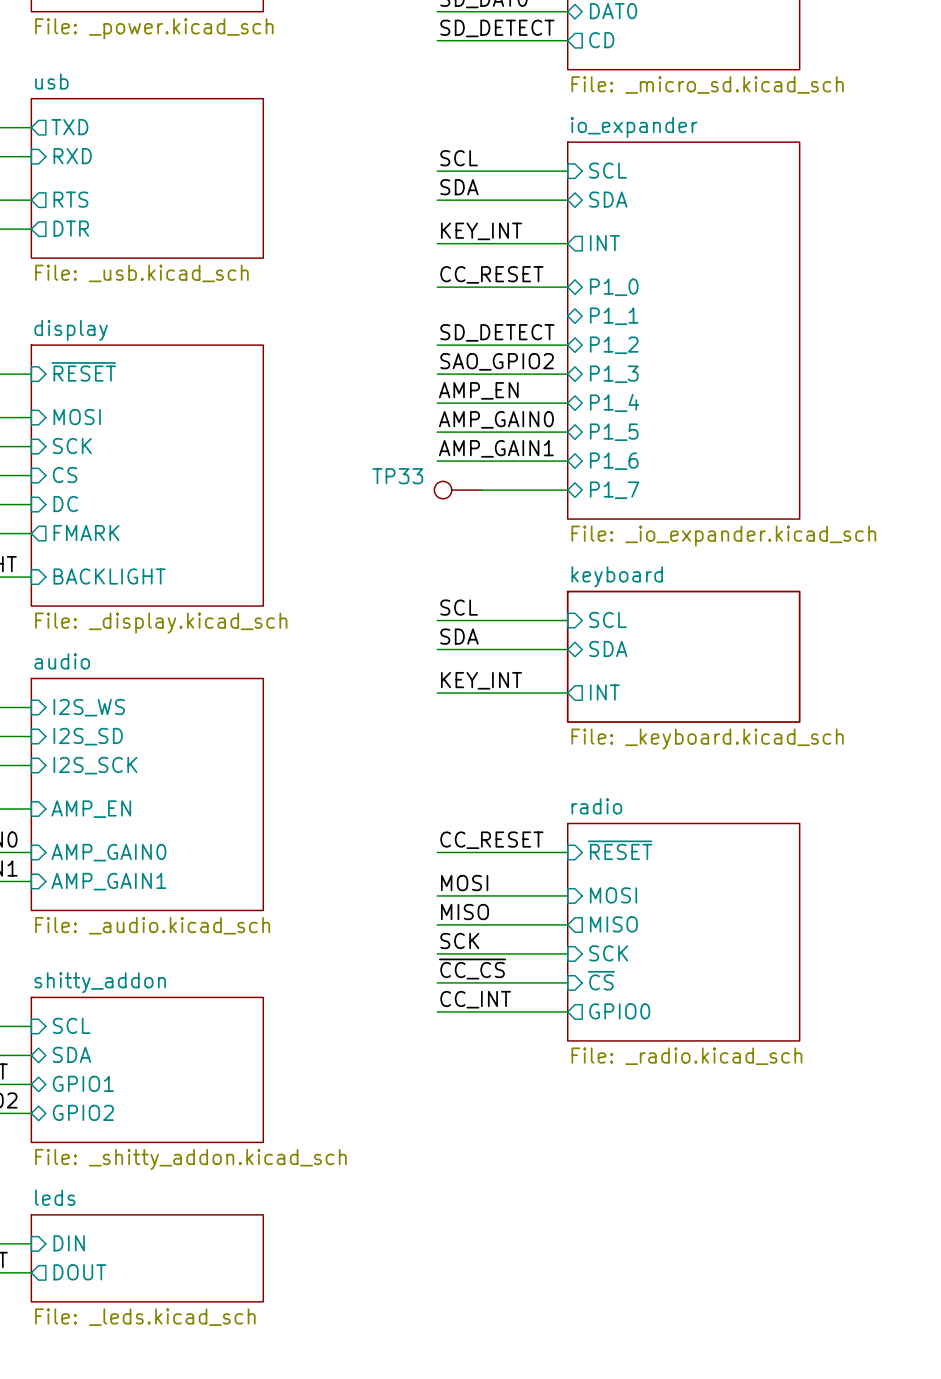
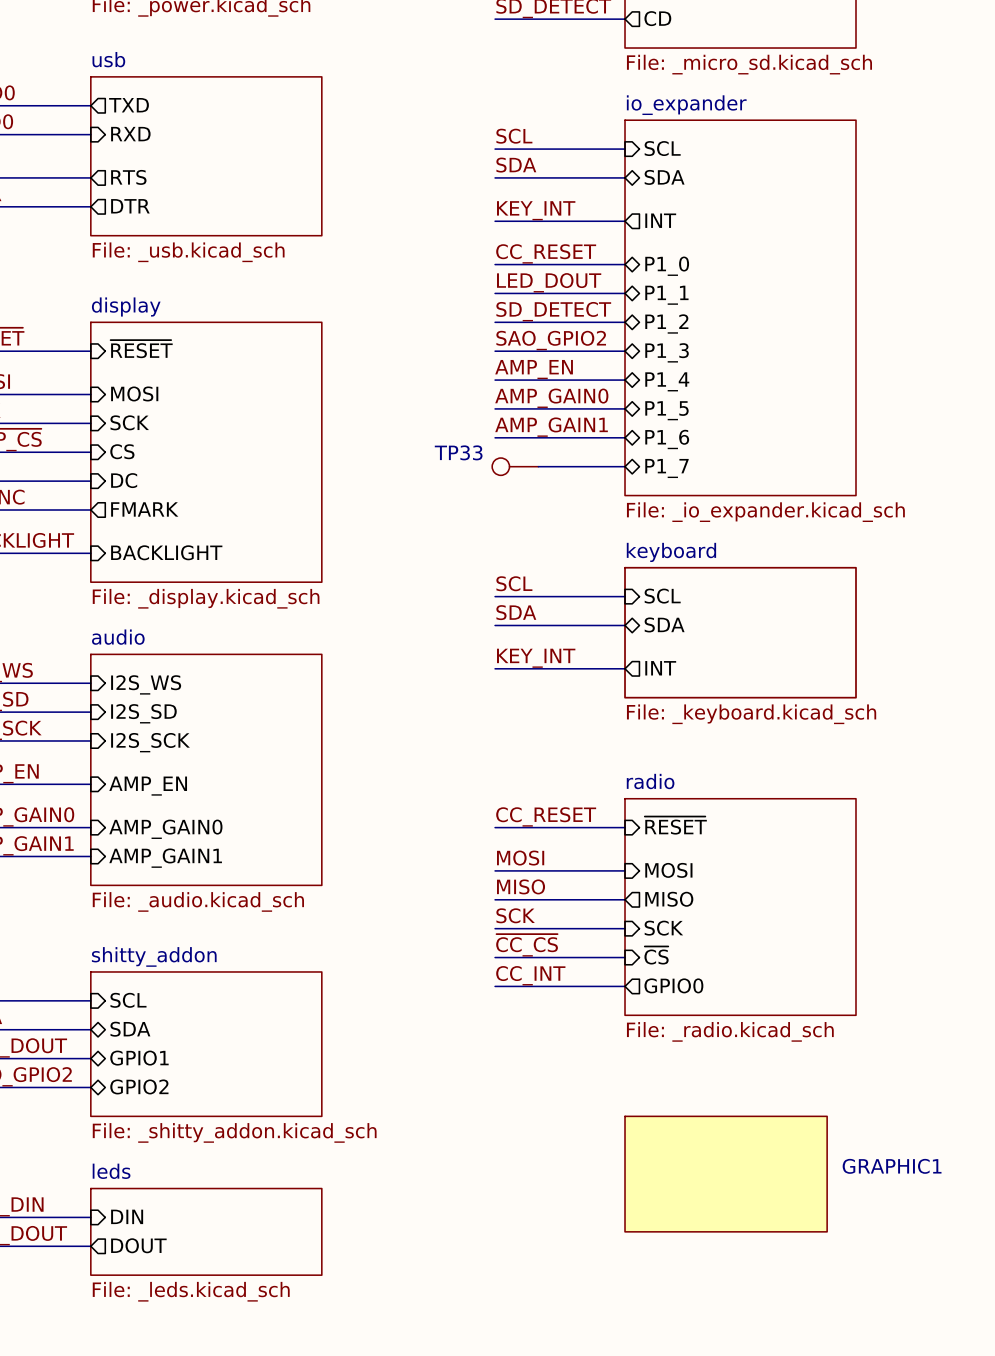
label: none -> LED_DOUT (549, 282)
wire: none -> (495, 293) (625, 293)
GRAPHIC1: none -> (726, 1174)

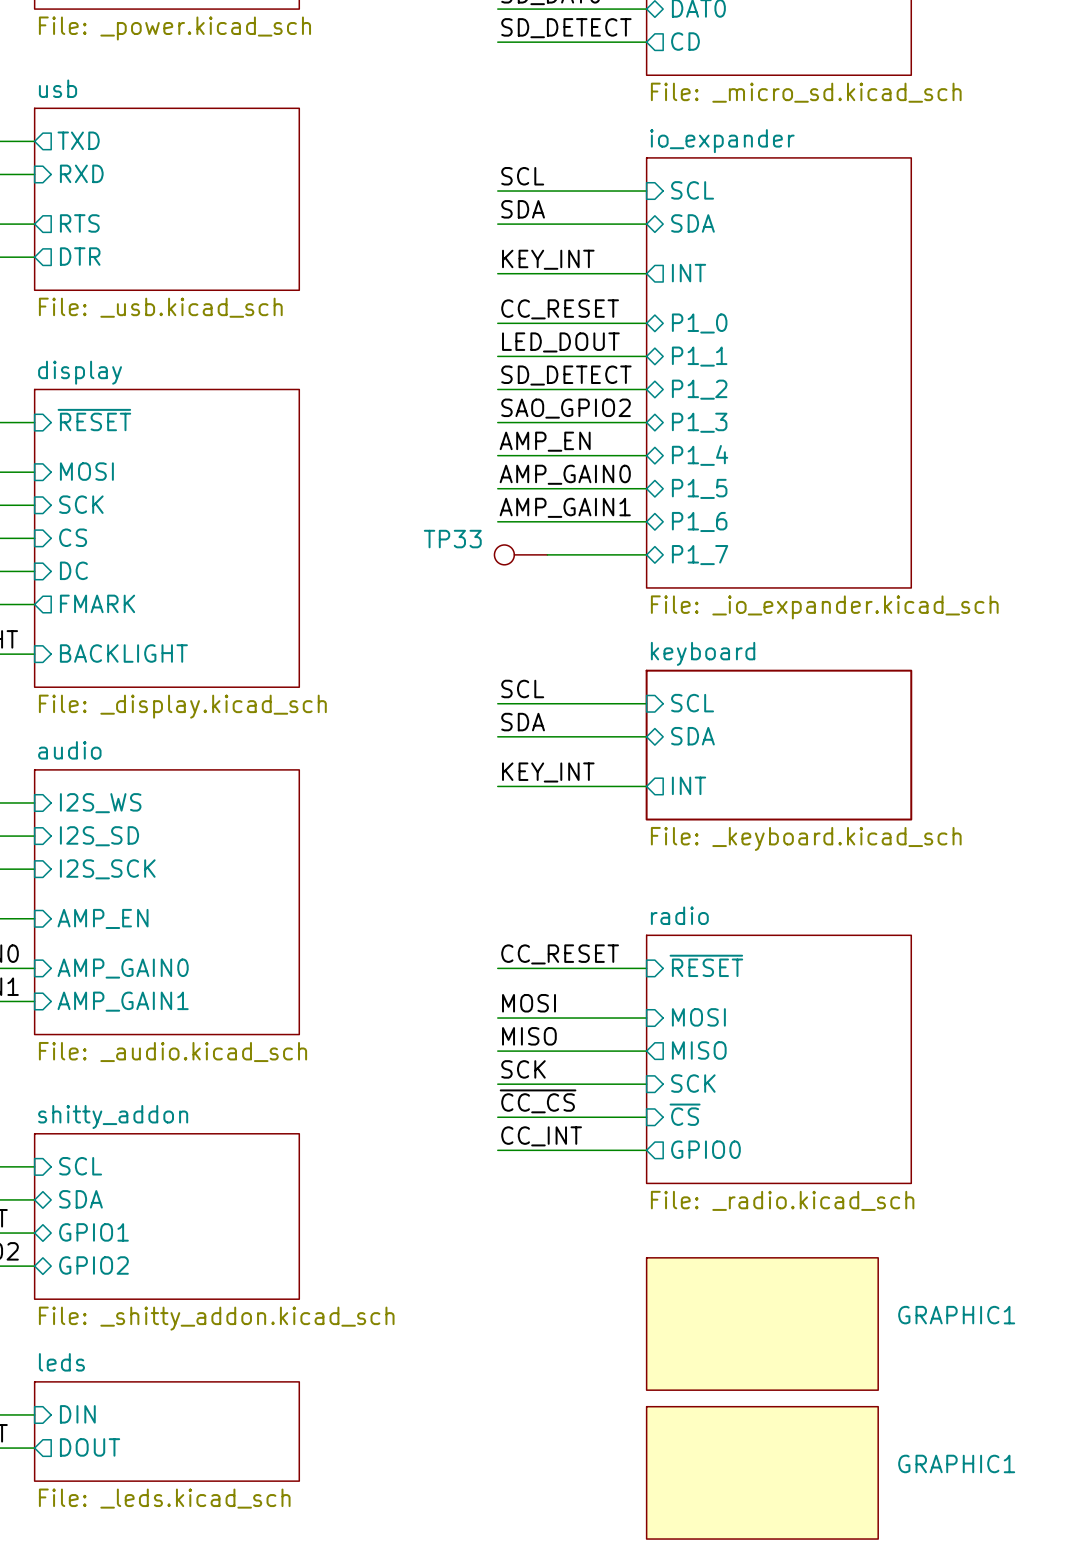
GRAPHIC1 position: (726, 1174) -> (762, 1324)
GRAPHIC1: none -> (762, 1472)

